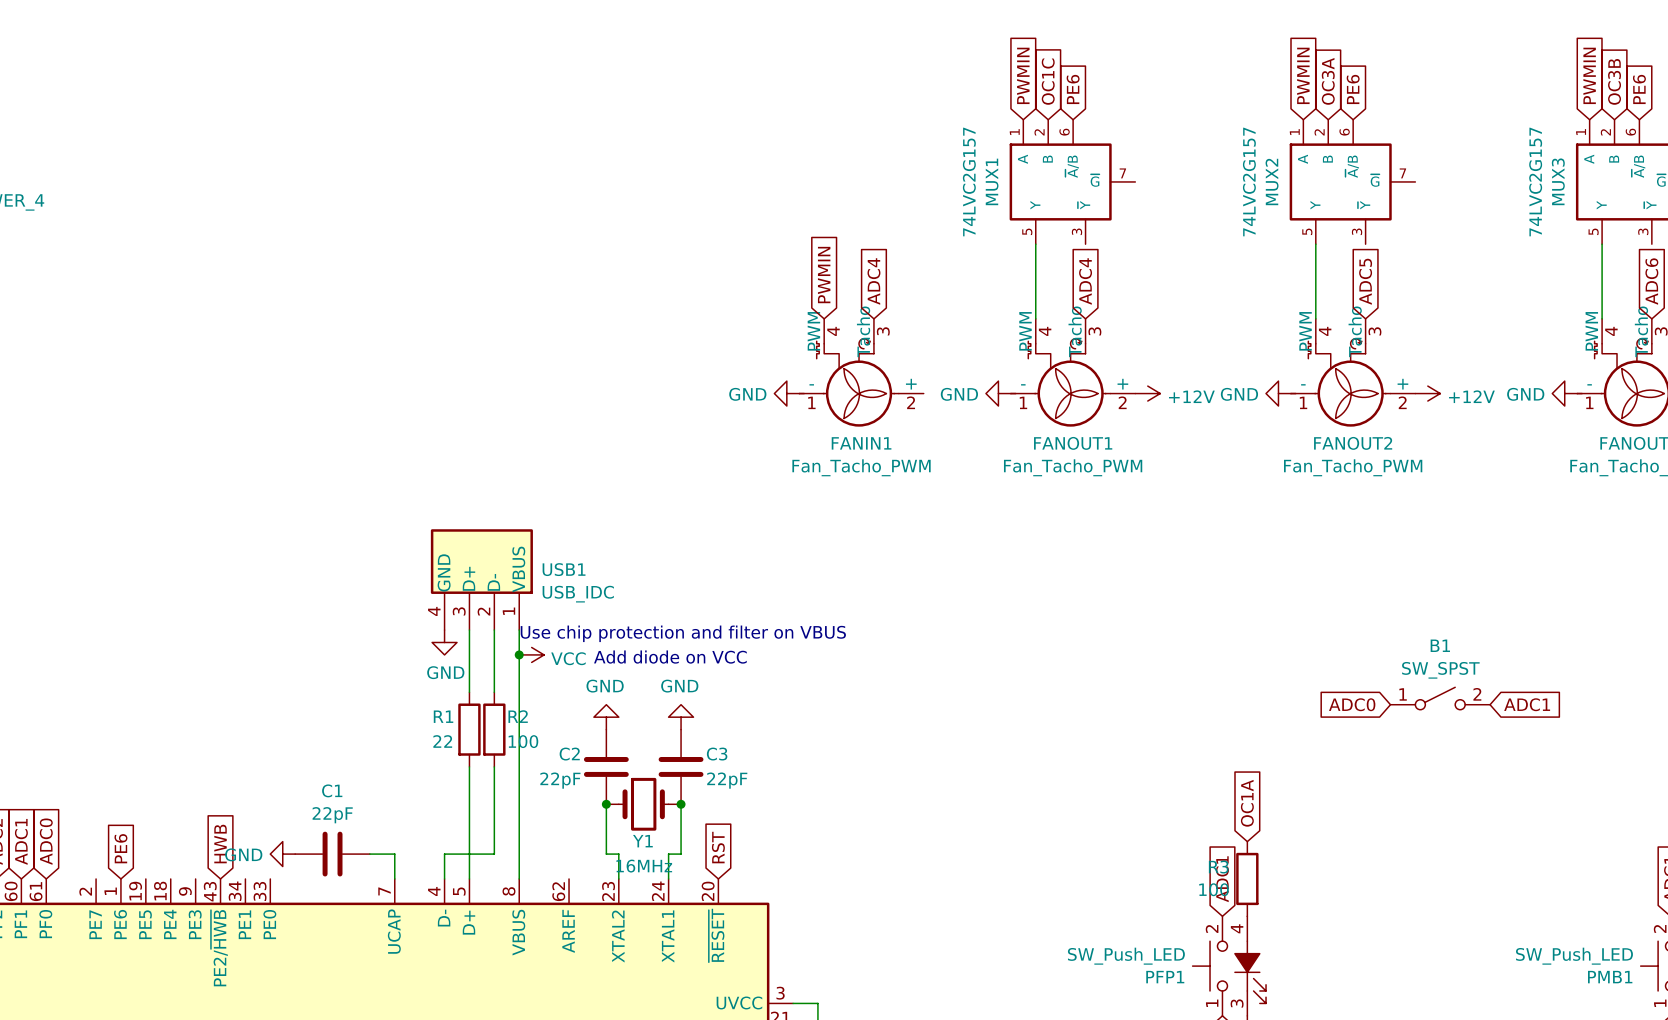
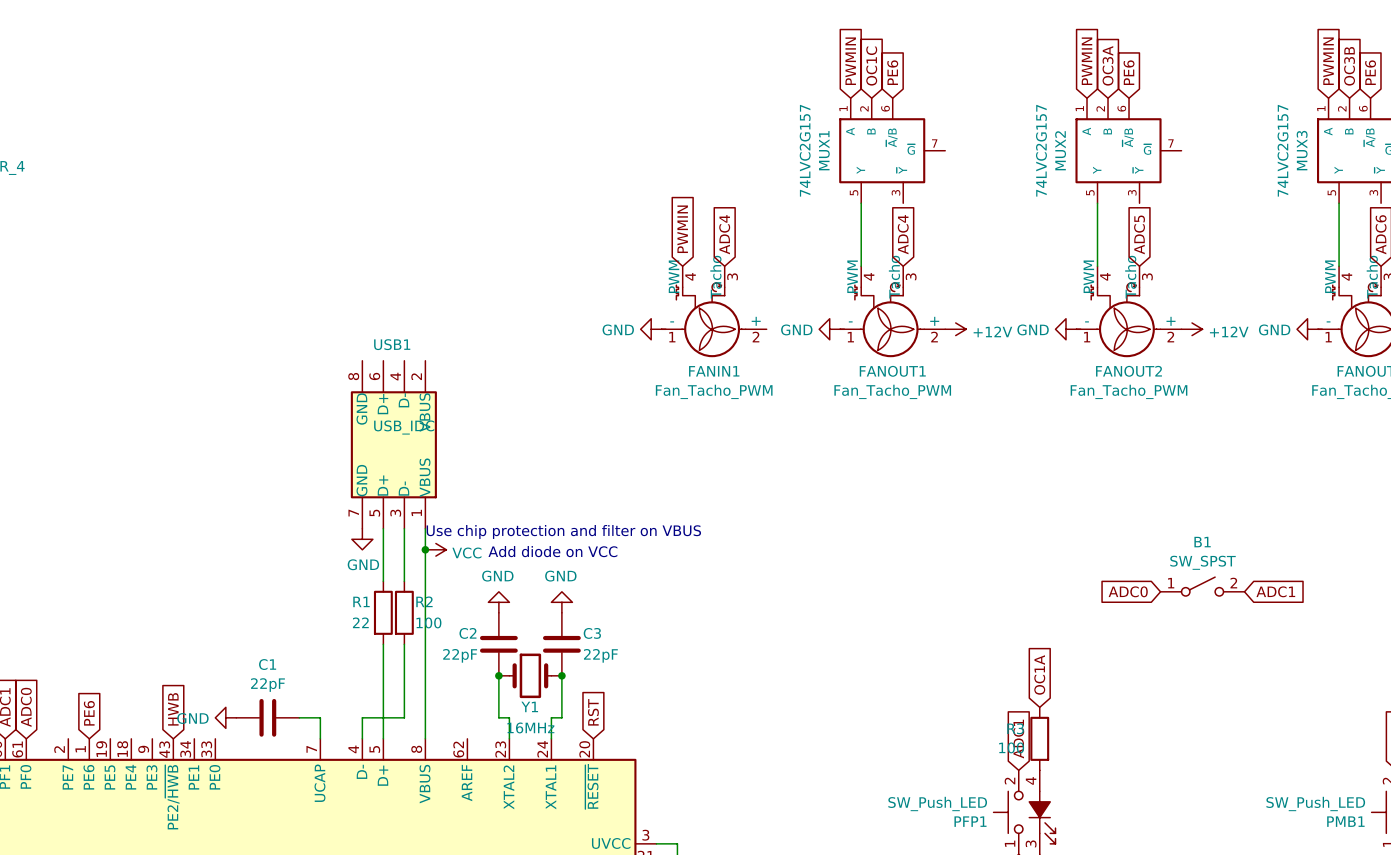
USB1 symbol: [430, 529, 533, 631] -> [350, 360, 437, 529]
USB1 name position: USB1 (564, 569) -> USB1 (392, 344)
USB1 value position: USB_IDC (578, 594) -> USB_IDC (404, 427)

